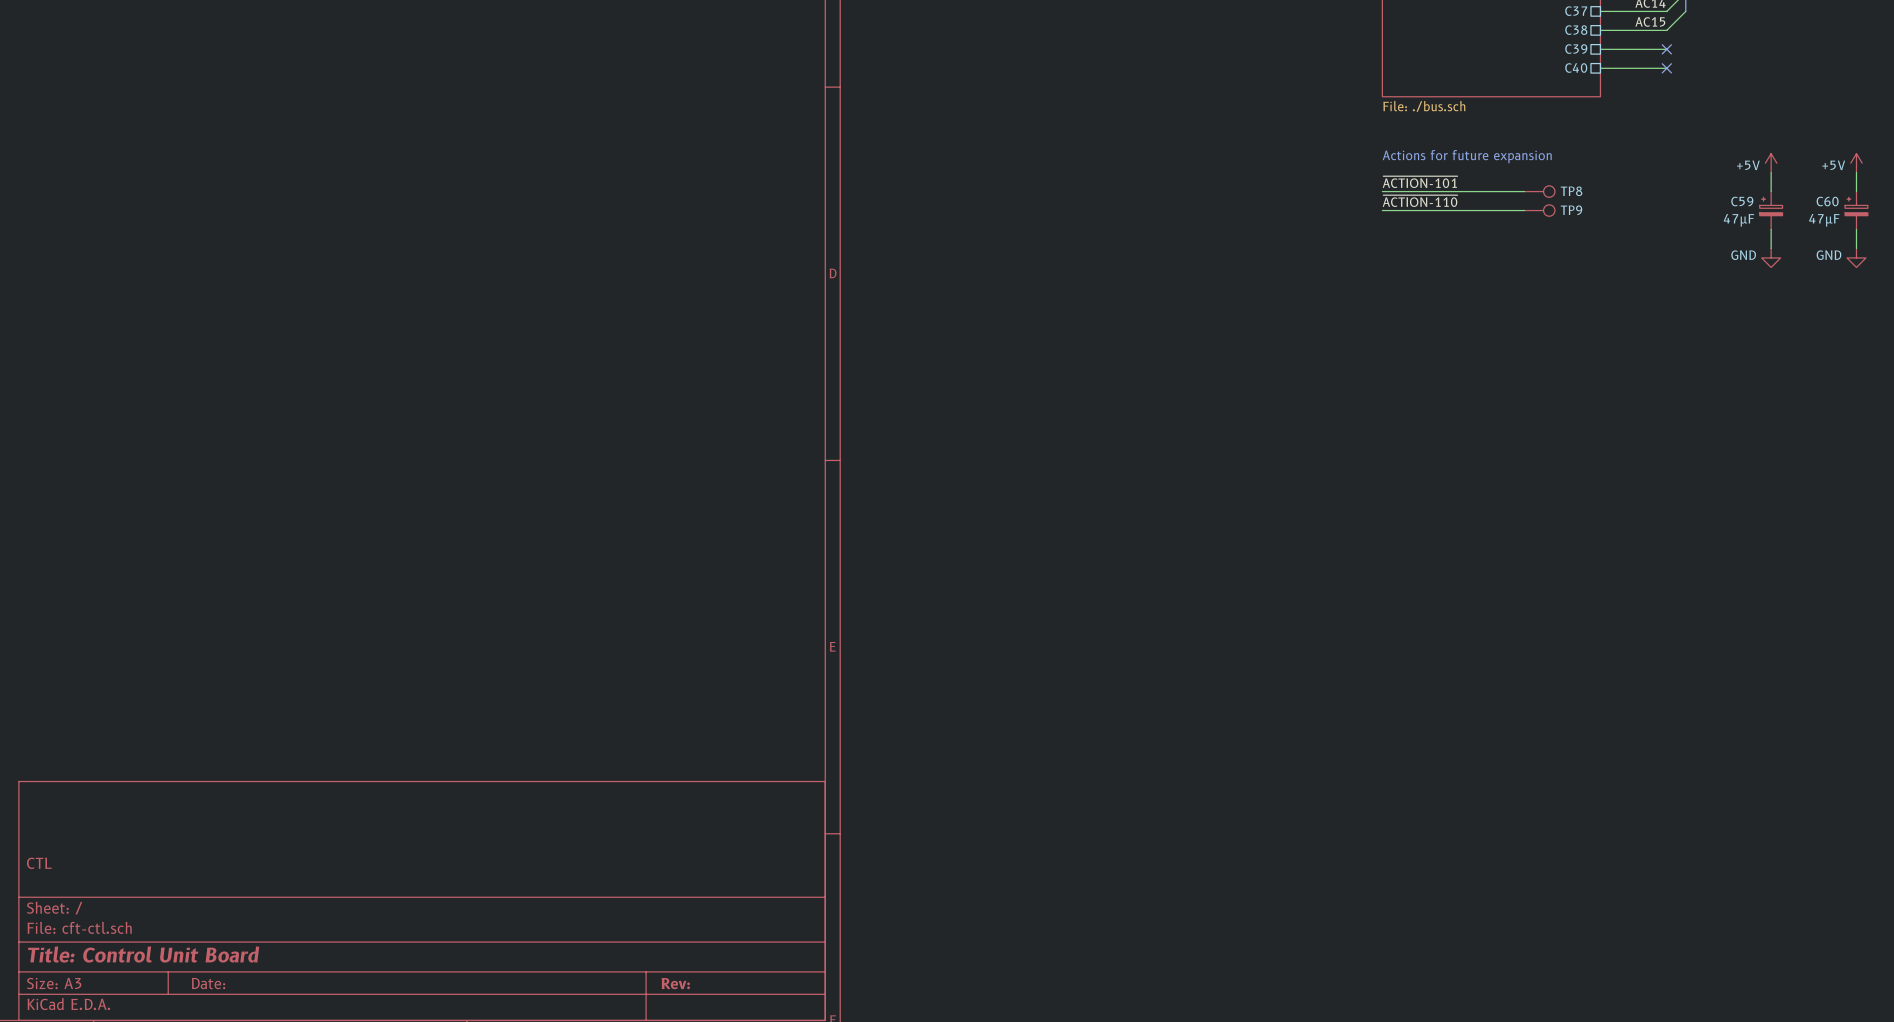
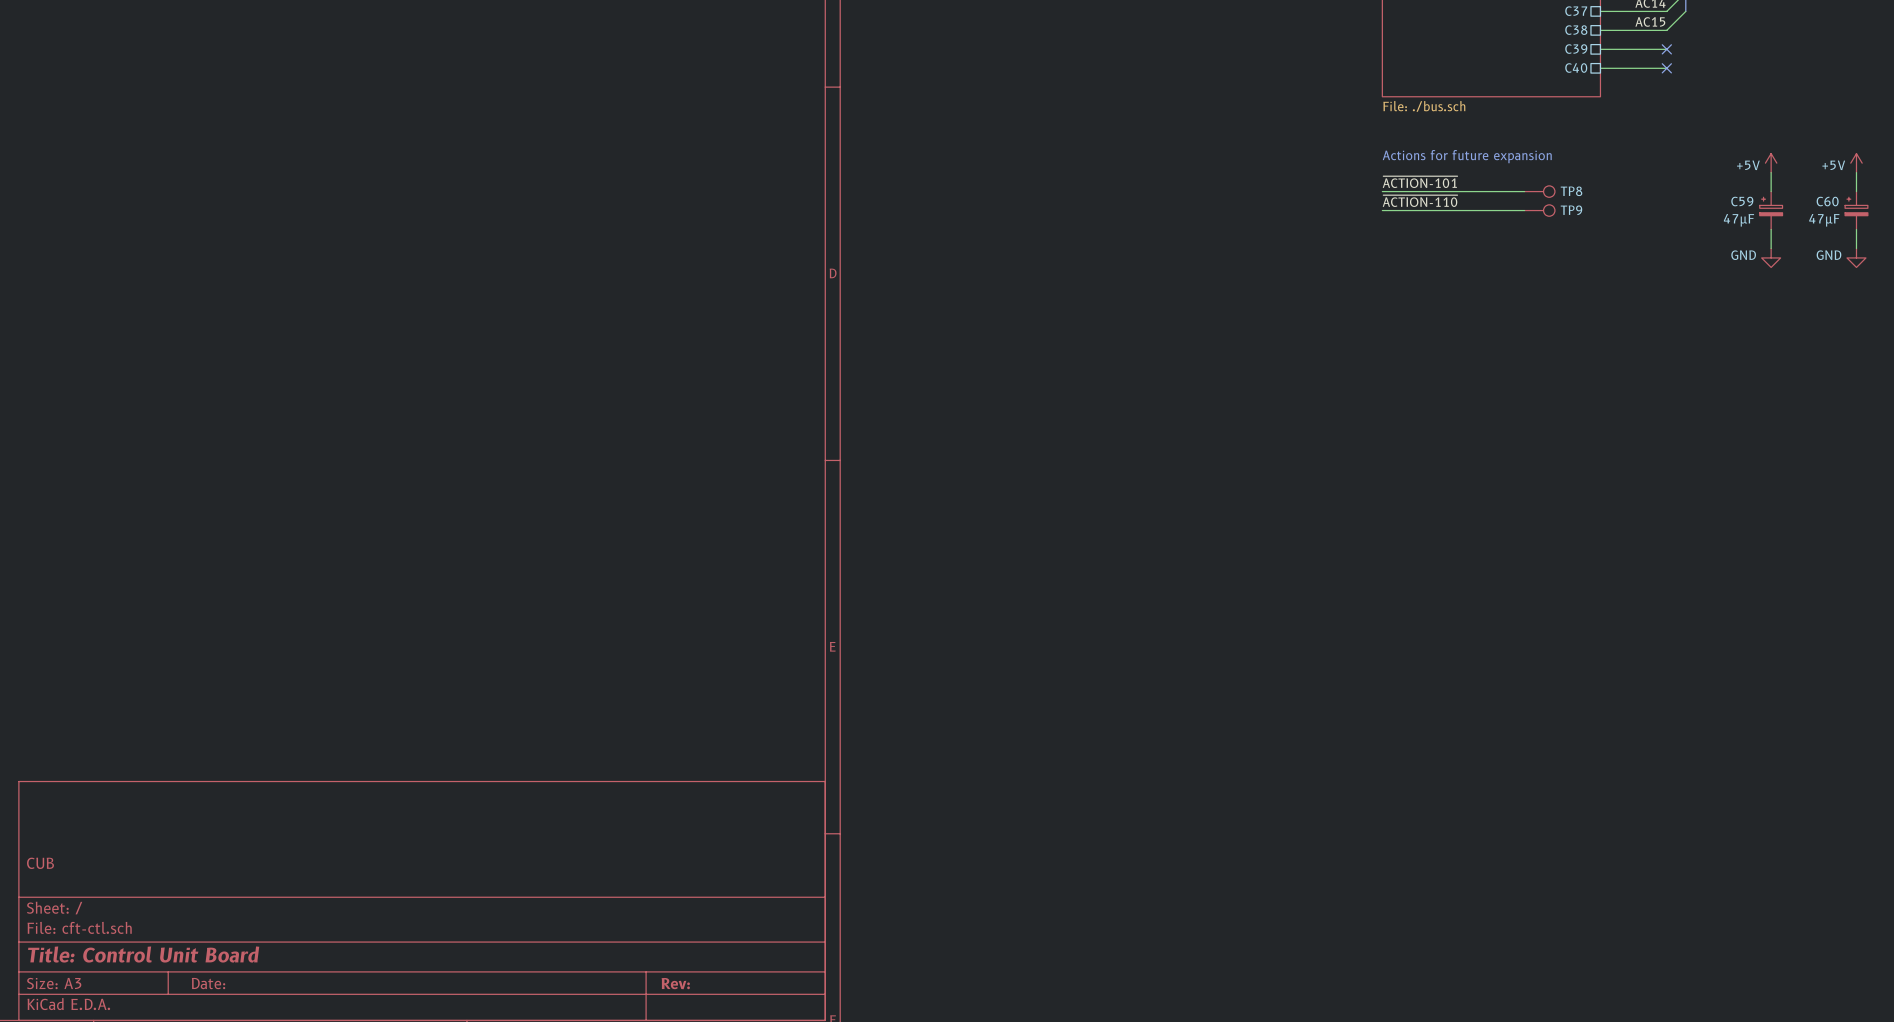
title block: CTL (39, 863) -> CUB (40, 863)

